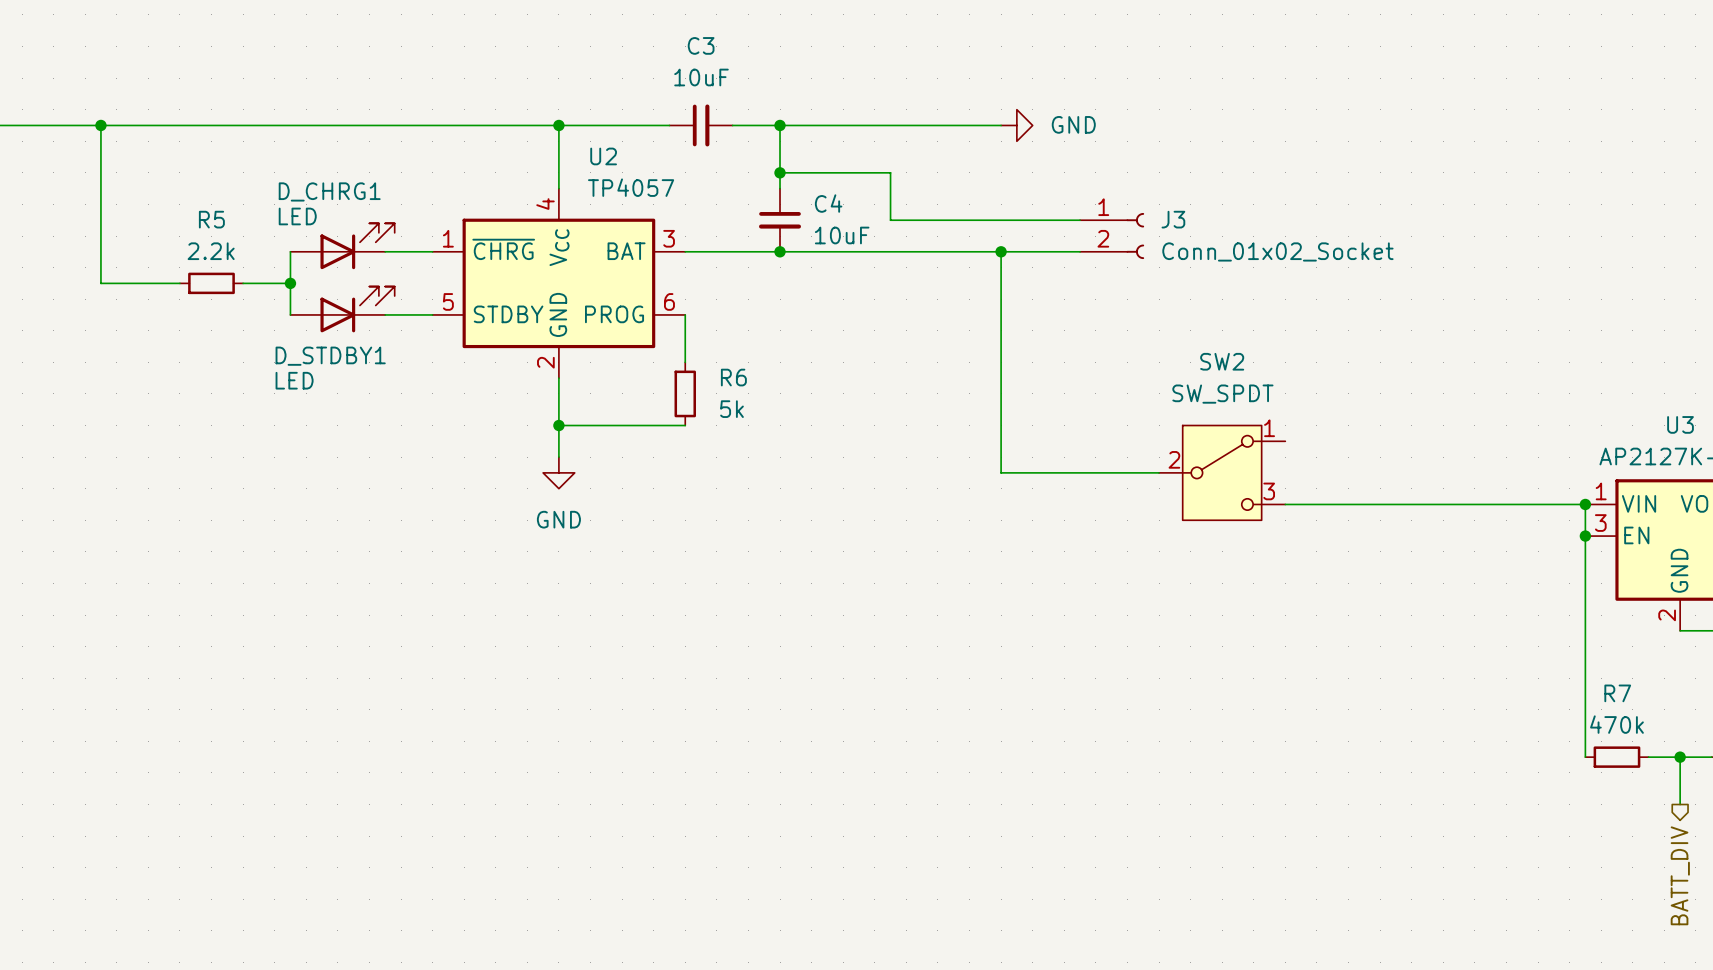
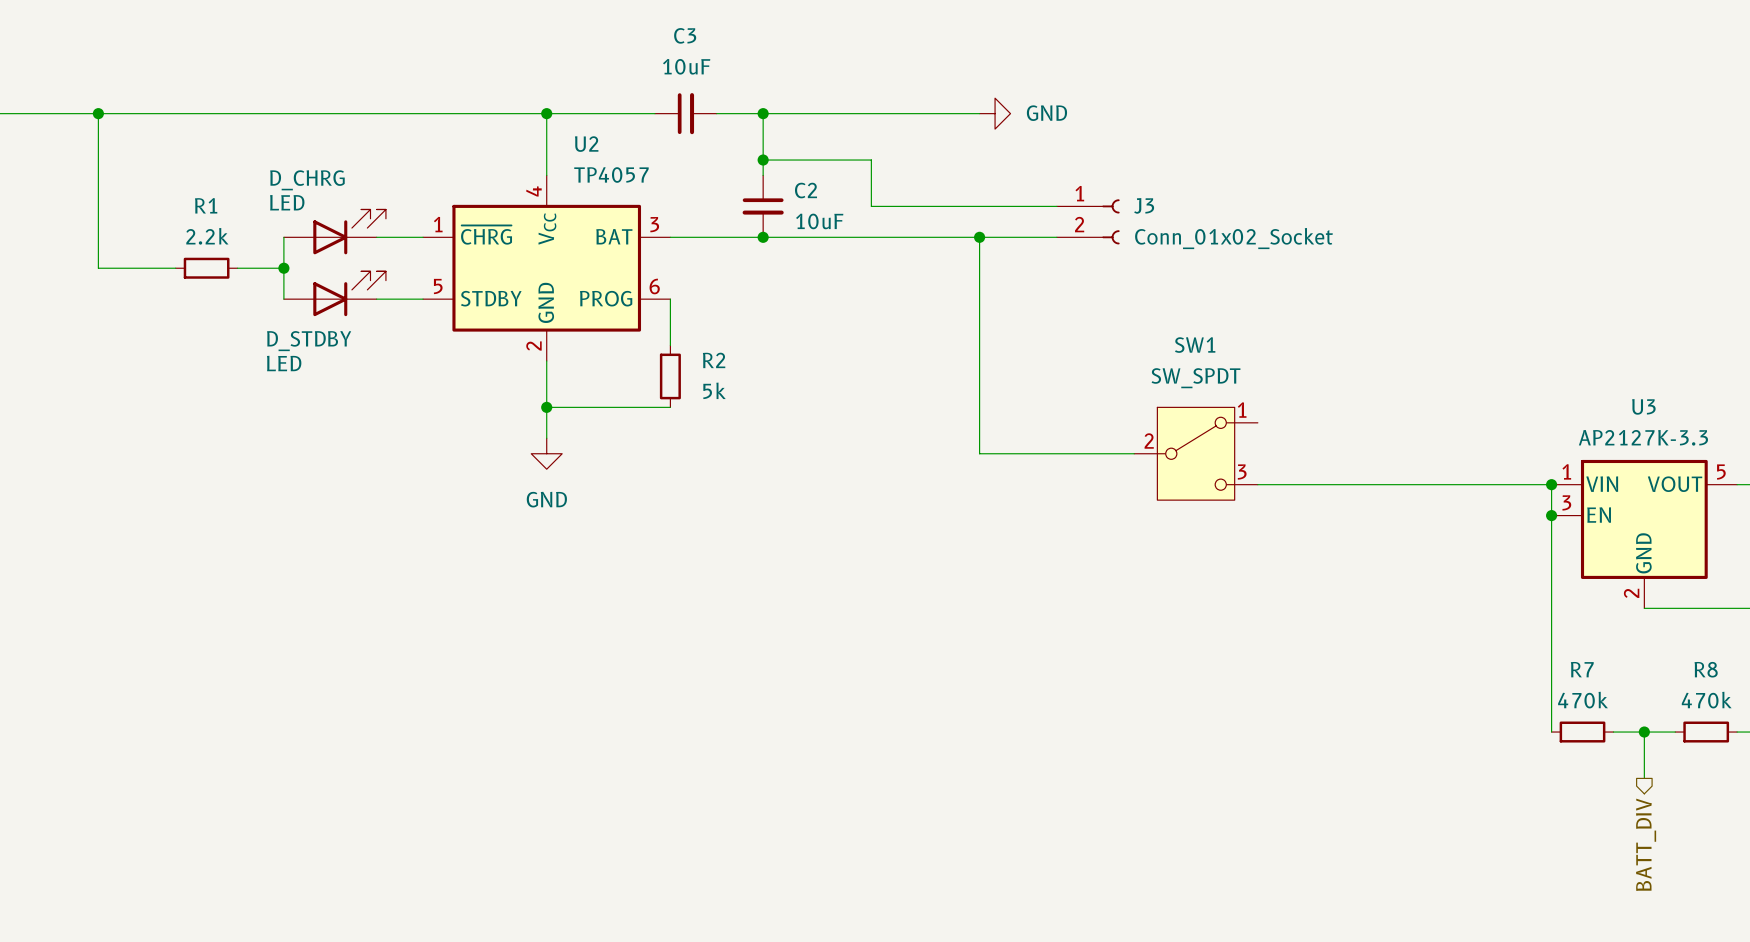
D_CHRG1 name: D_CHRG1 (329, 191) -> D_CHRG (307, 180)
C4 name: C4 (828, 203) -> C2 (806, 190)
R5 name: R5 (211, 219) -> R1 (206, 205)
D_STDBY1 name: D_STDBY1 (330, 356) -> D_STDBY (309, 341)
SW2 name: SW2 (1222, 361) -> SW1 (1195, 345)
R6 name: R6 (733, 377) -> R2 (714, 360)

